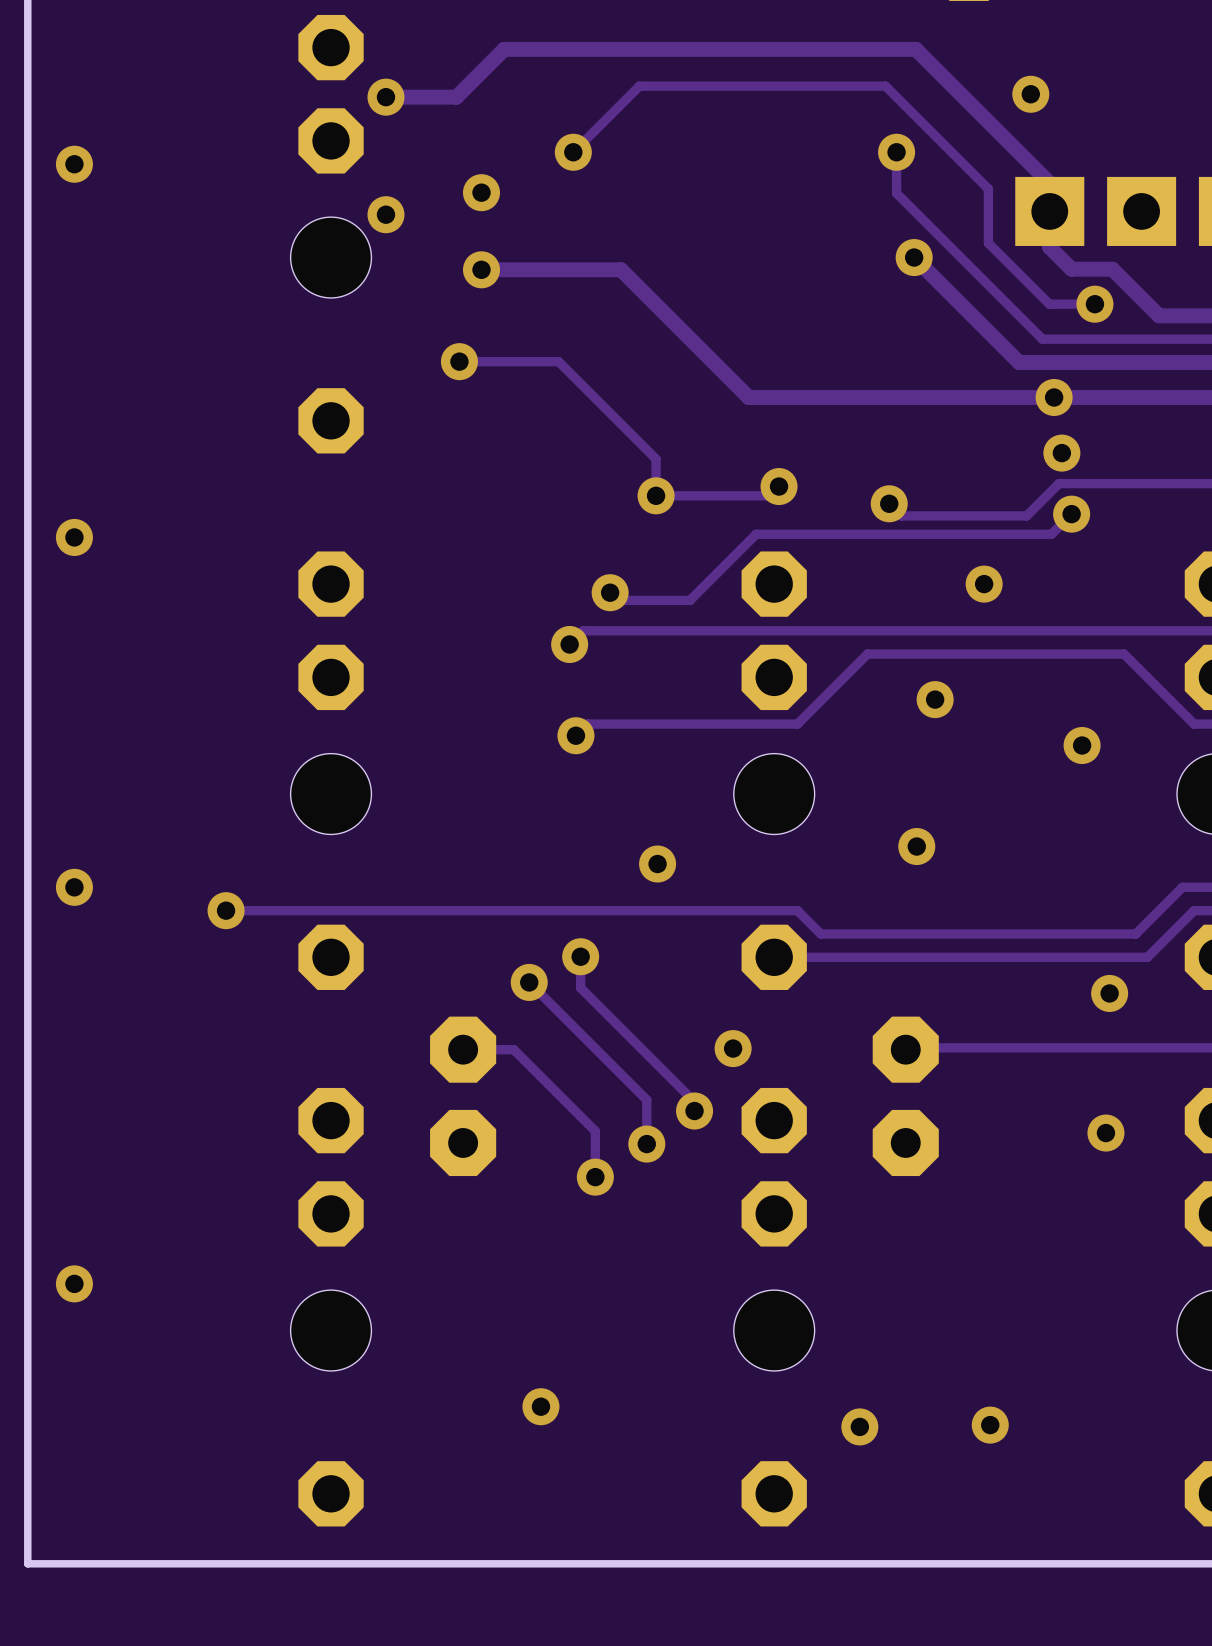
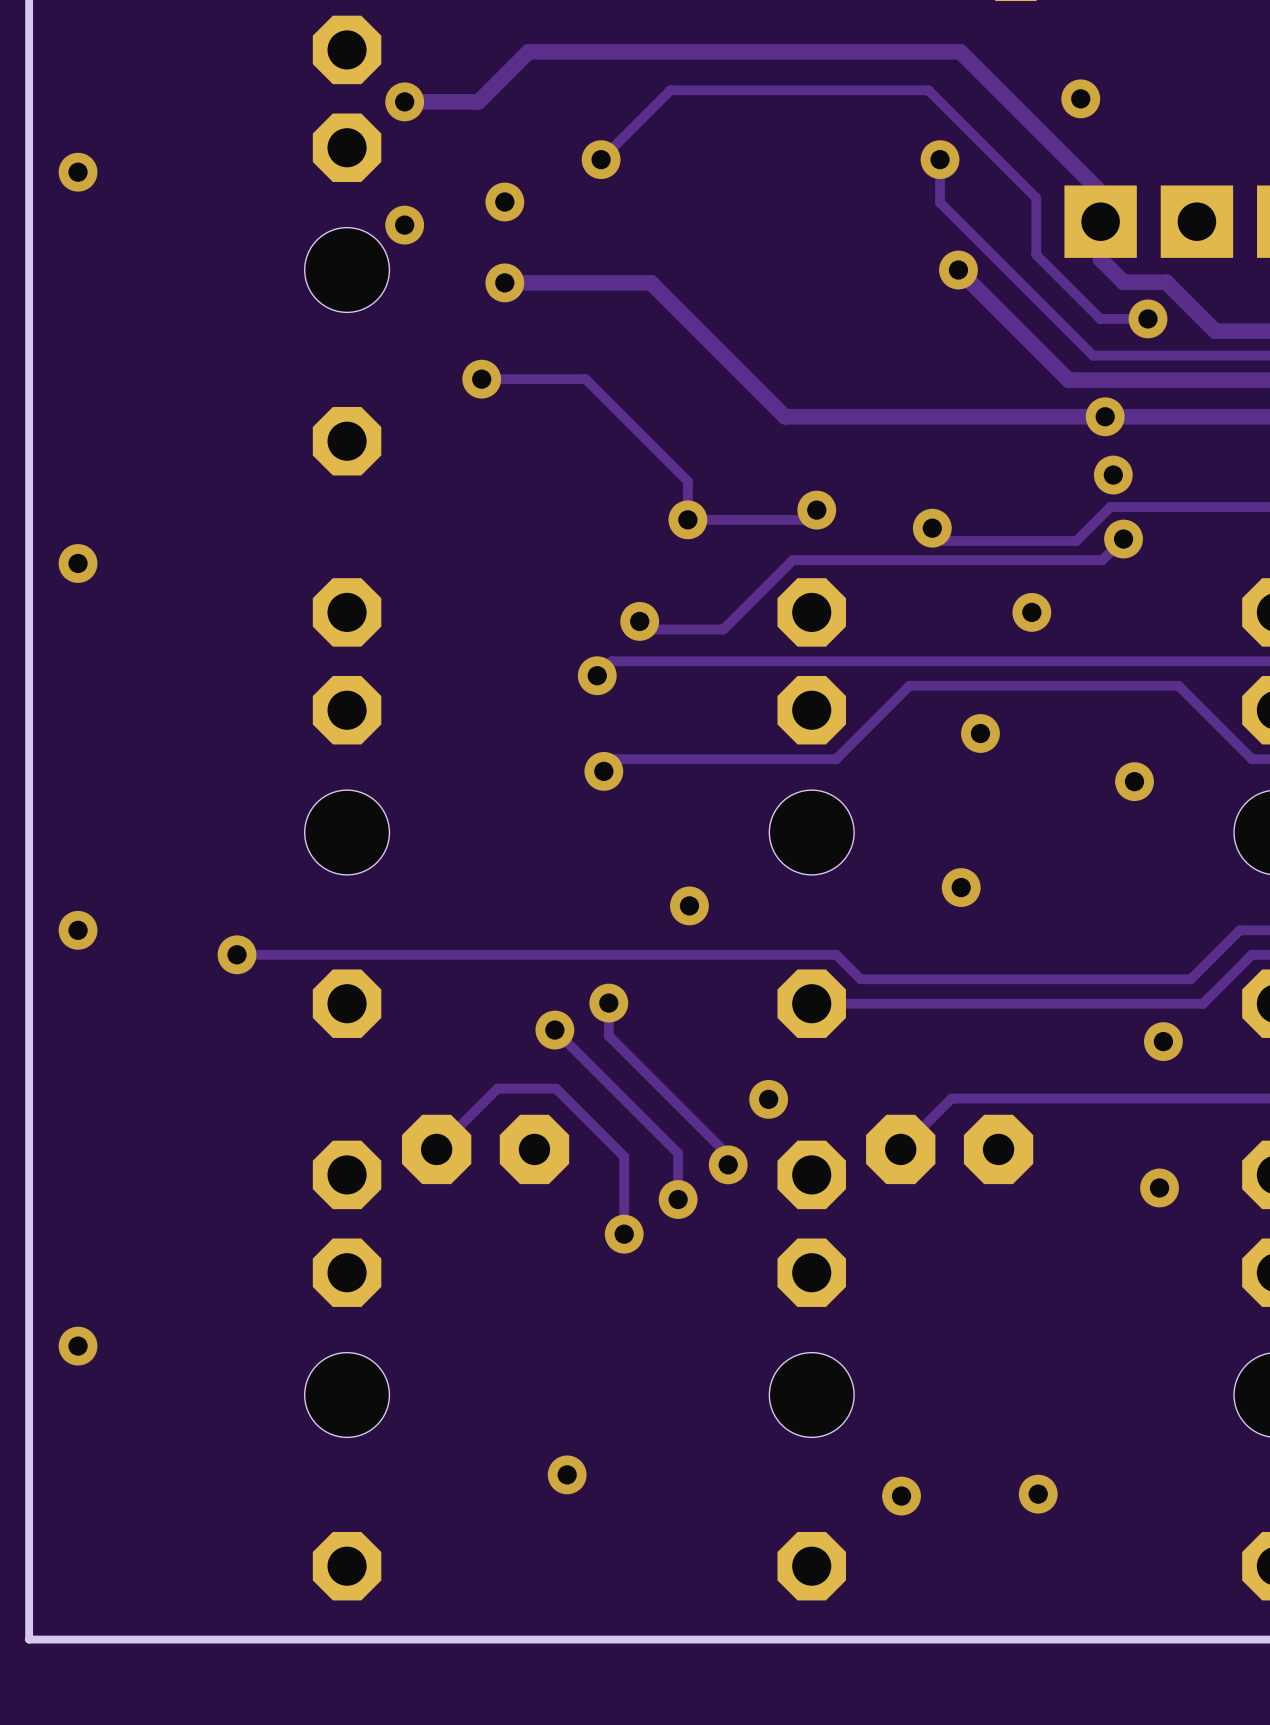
track: (463, 1049) (513, 1049) (595, 1131) -> (436, 1149) (497, 1088) (556, 1088) (624, 1156) (624, 1186)
track: none -> (949, 1100) (900, 1149)
part rotation: 0° (463, 1096) -> 90° clockwise (485, 1149)
part rotation: 0° (905, 1096) -> 90° clockwise (949, 1149)

